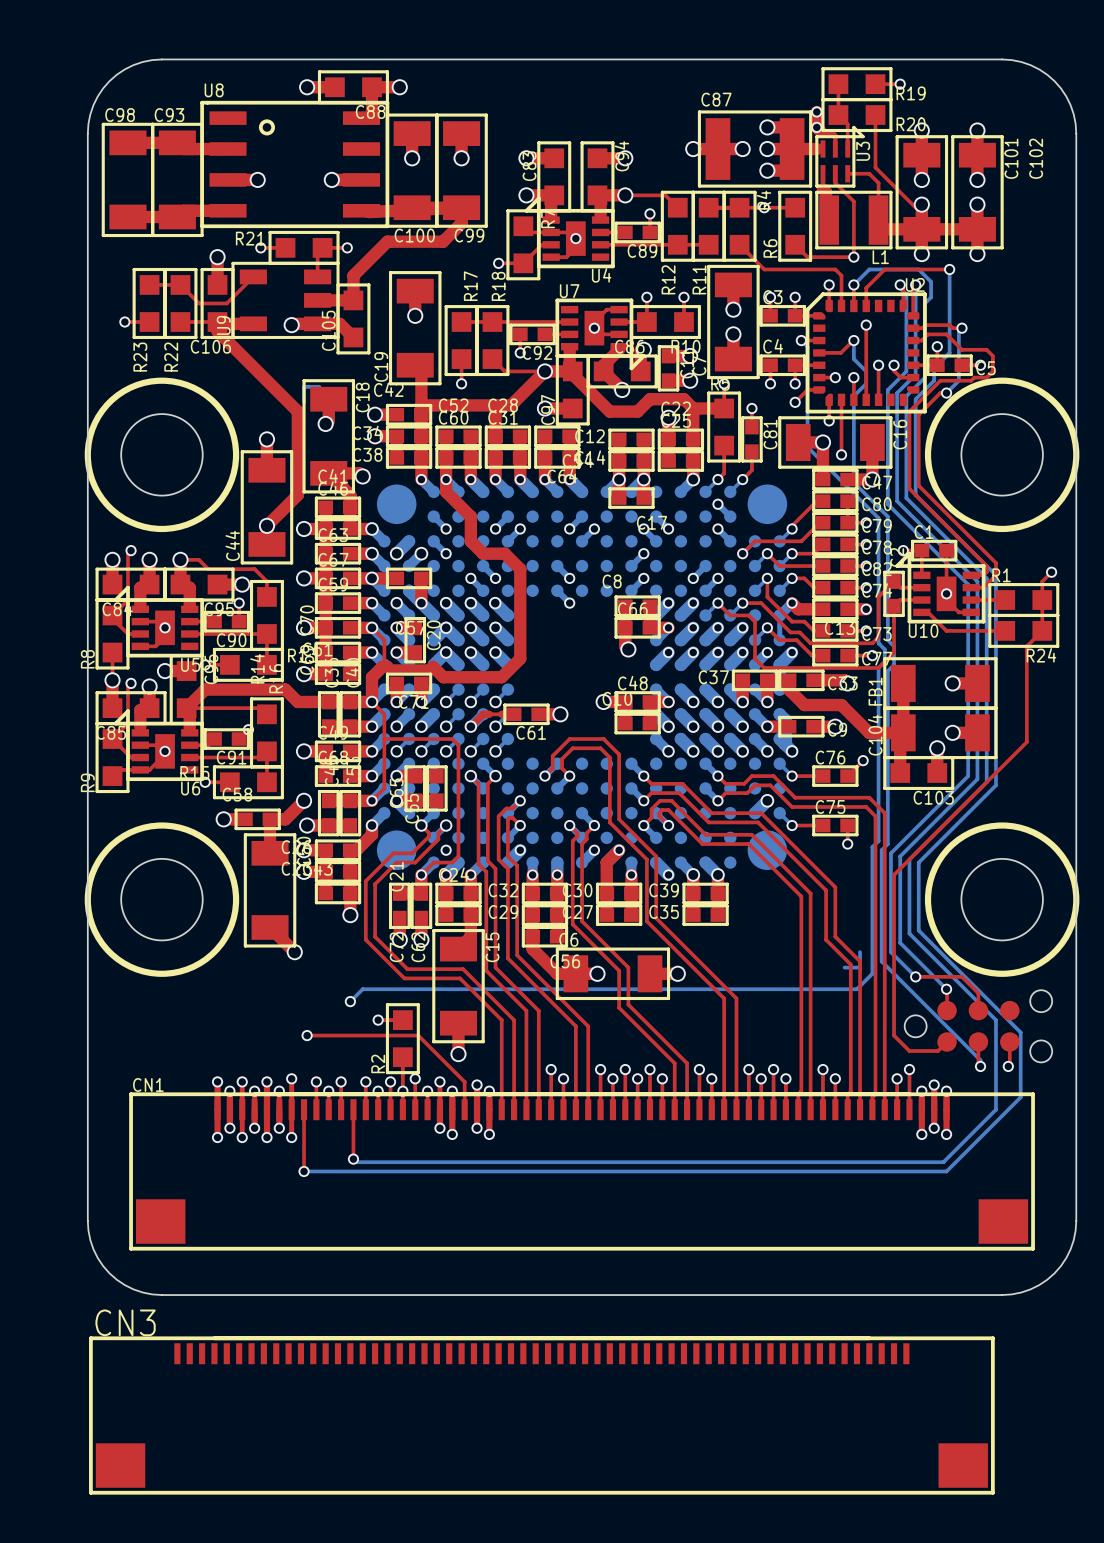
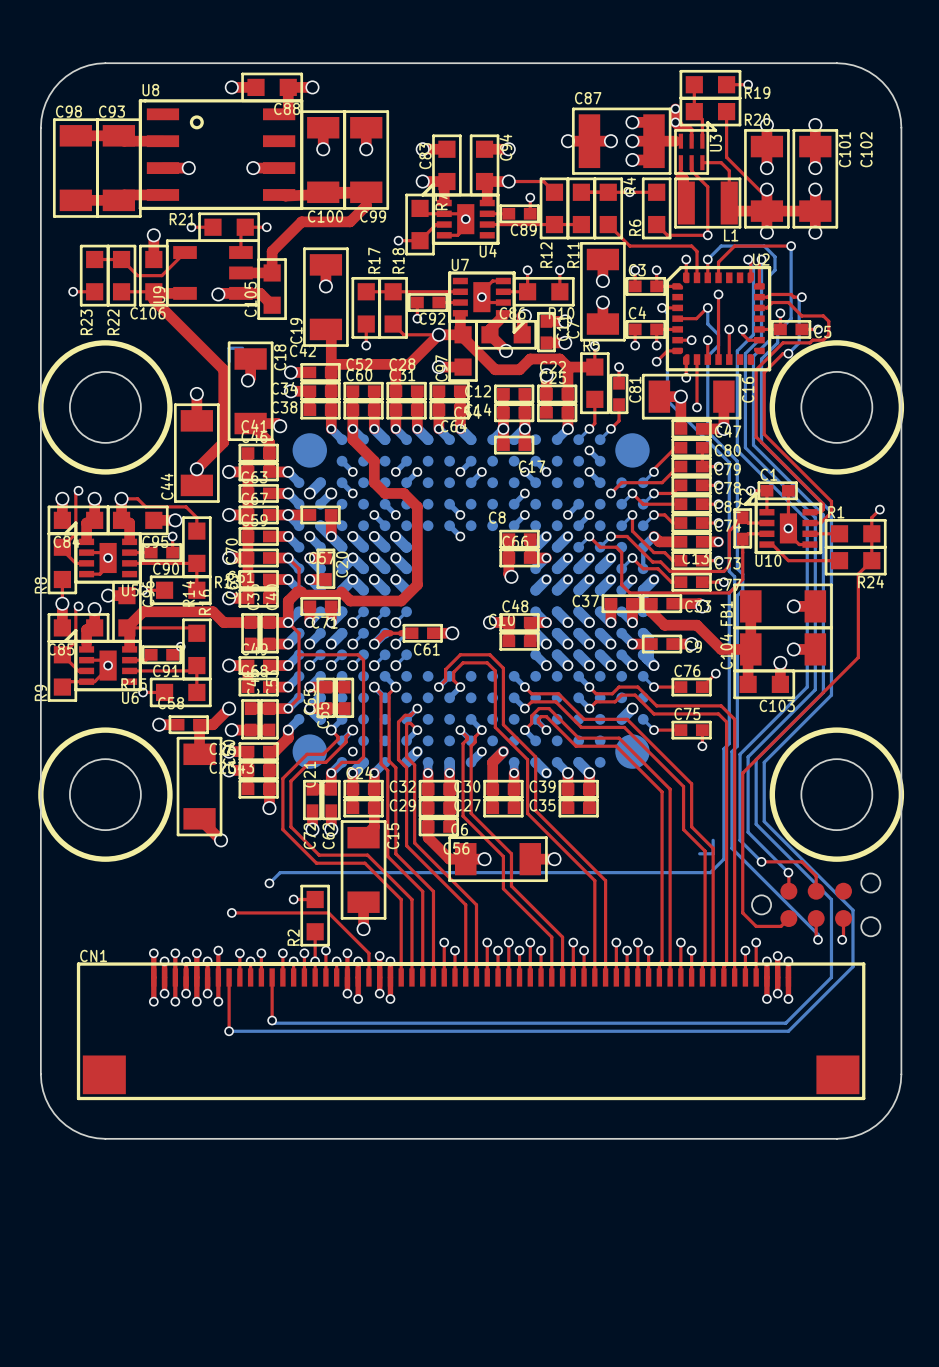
CN3: (541, 1415) -> none

